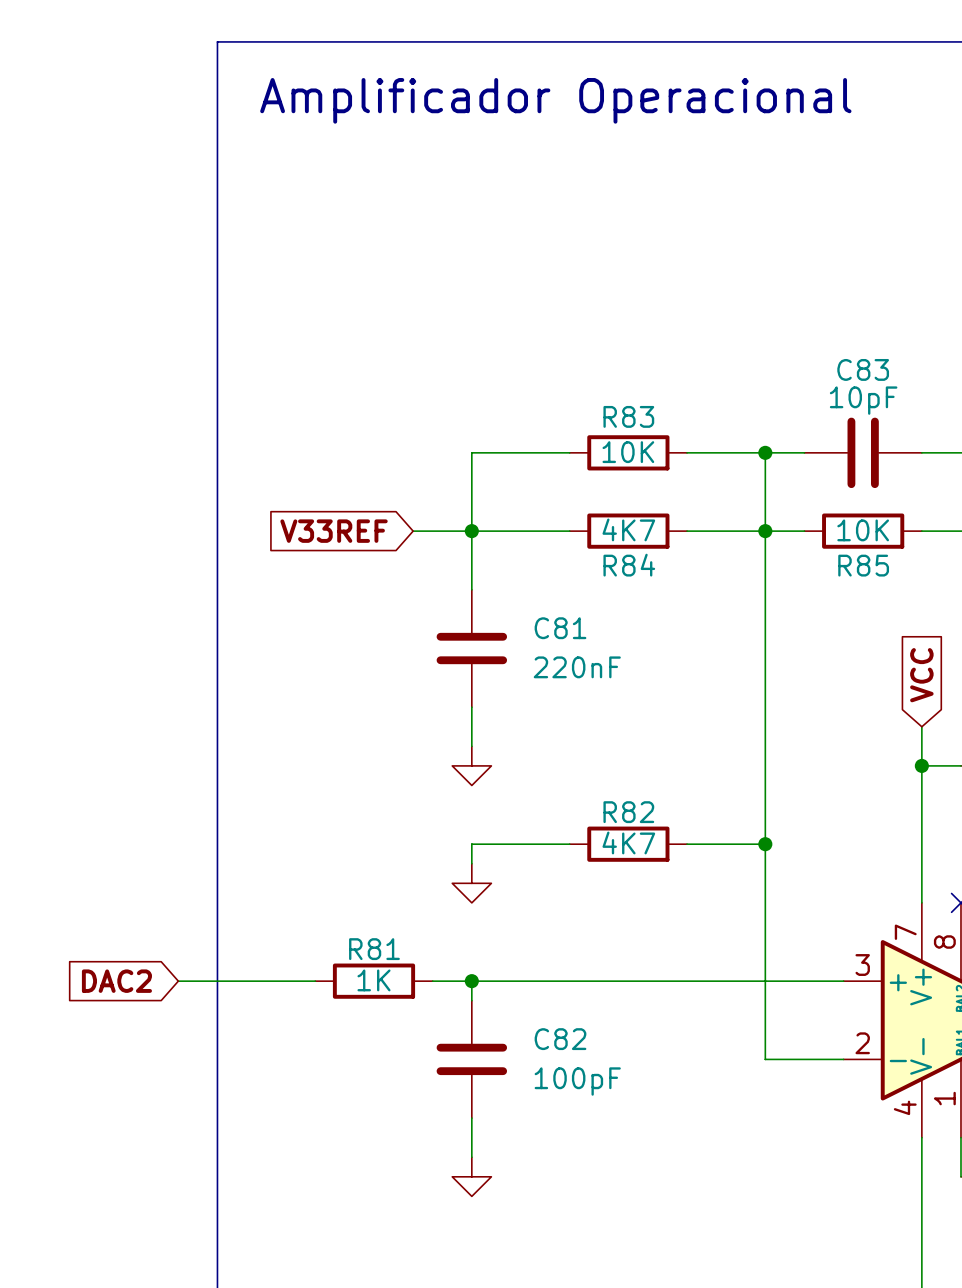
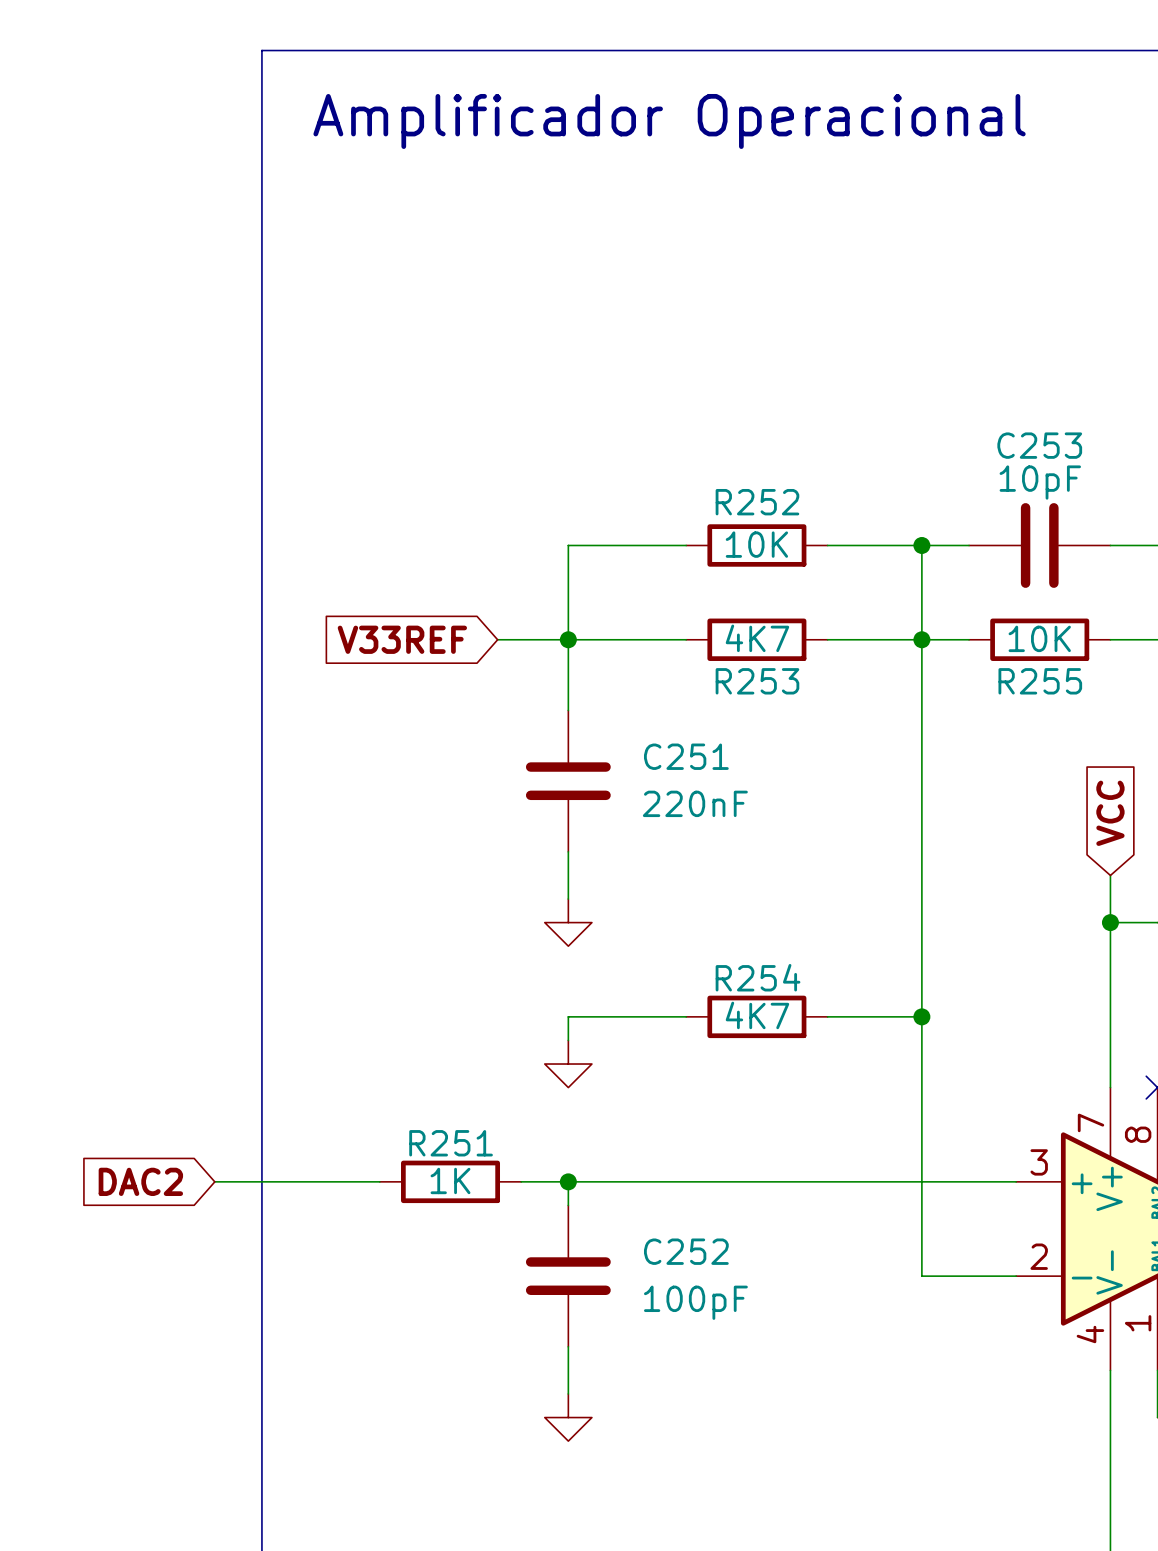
C83 name: C83 (863, 369) -> C253 (1039, 445)
R83 name: R83 (628, 416) -> R252 (757, 502)
R84 name: R84 (629, 565) -> R253 (757, 681)
R85 name: R85 (863, 565) -> R255 (1040, 681)
C81 name: C81 (560, 628) -> C251 (686, 756)
R82 name: R82 (628, 812) -> R254 (758, 977)
R81 name: R81 (374, 949) -> R251 (451, 1143)
C82 name: C82 (560, 1039) -> C252 (686, 1251)

